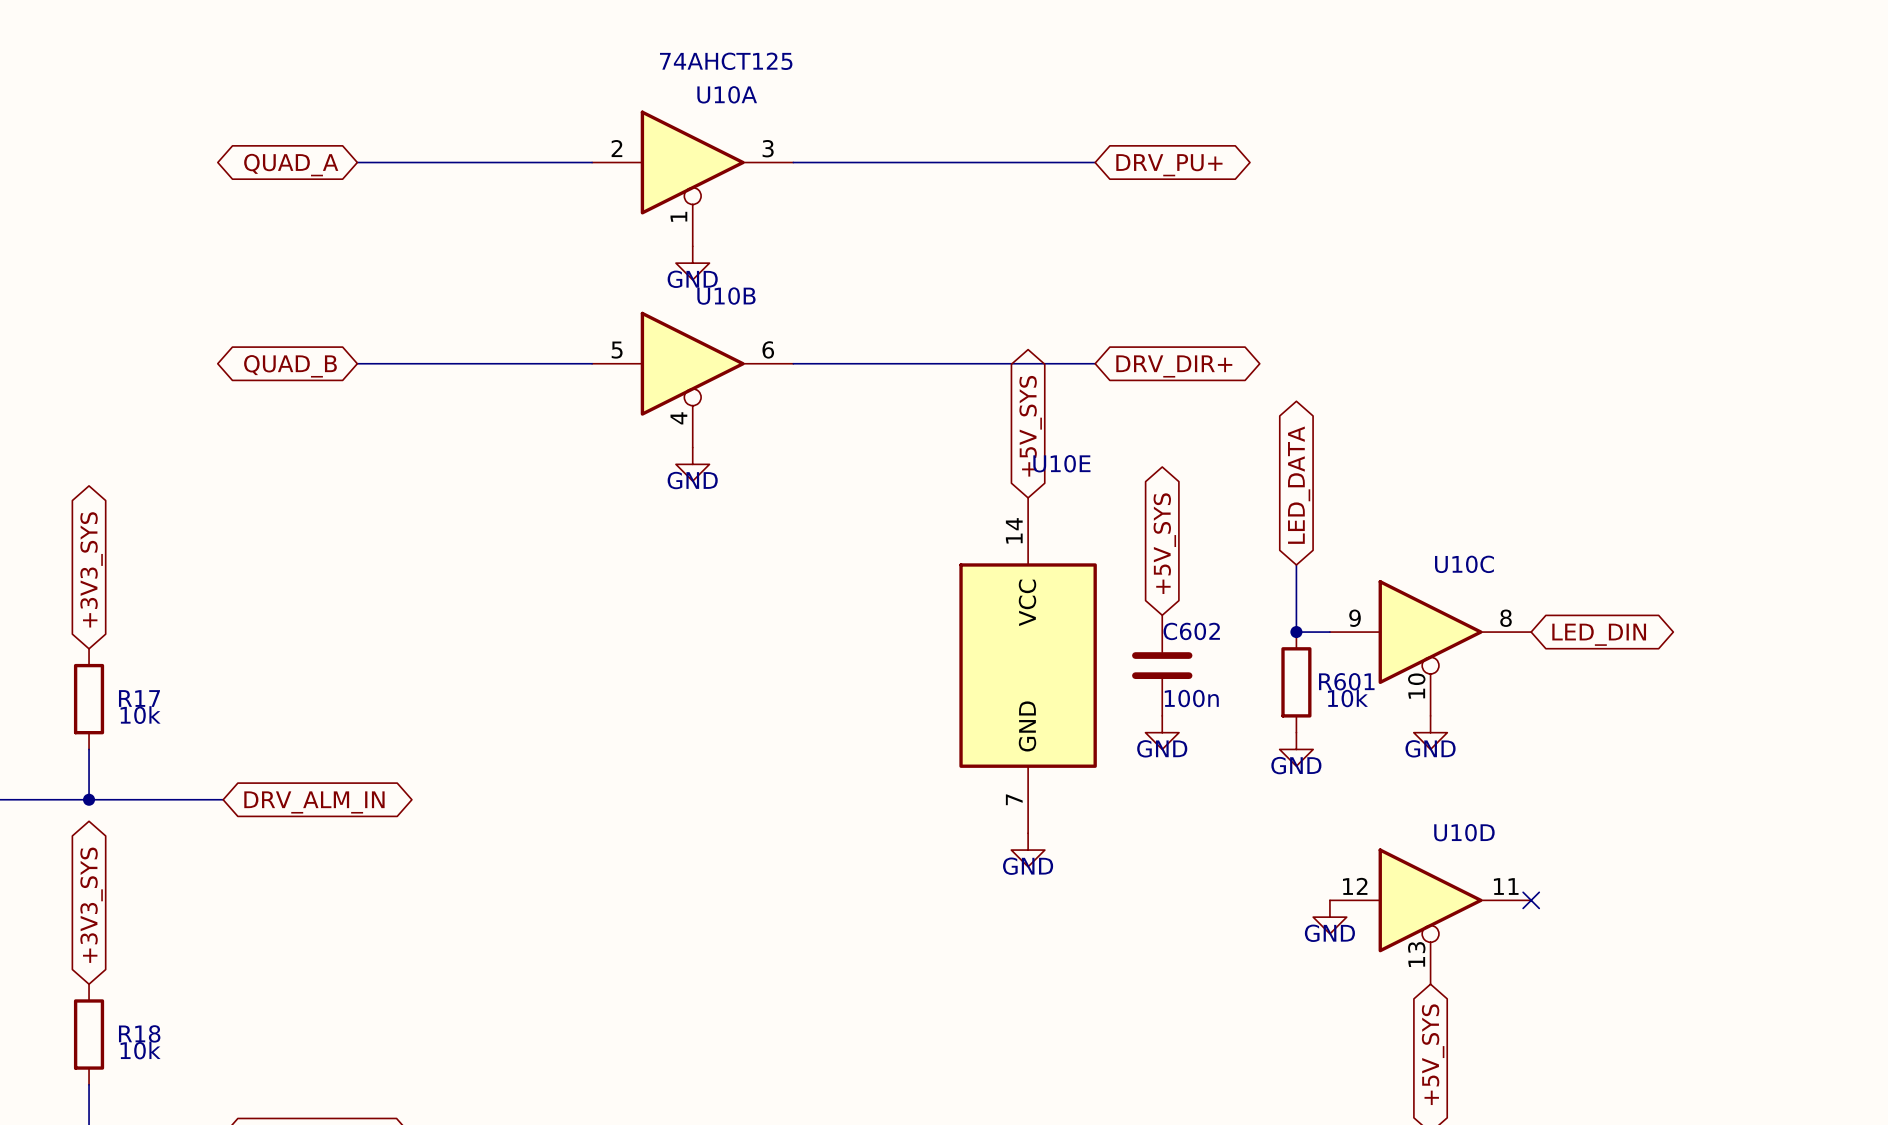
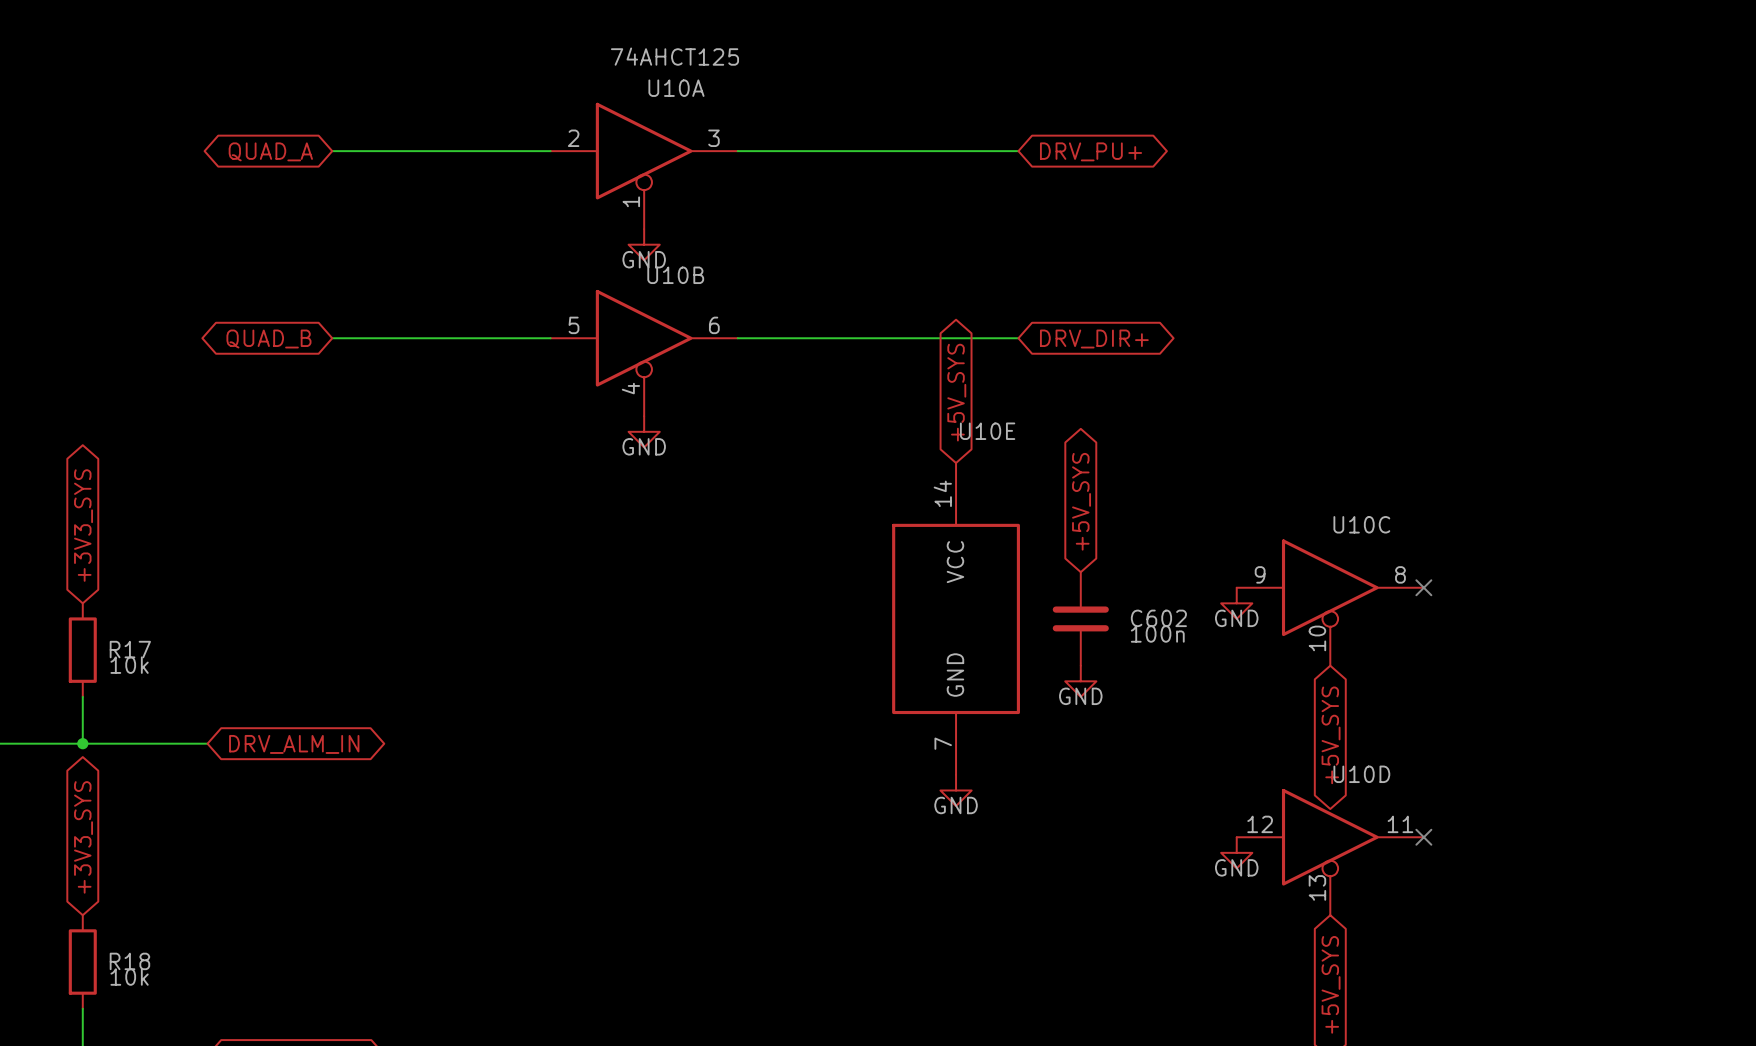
global label: LED_DATA (1299, 485) -> none
wire: (1296, 564) (1296, 632) (1329, 632) -> none
C602 name position: C602 (1191, 631) -> C602 (1158, 618)
junction: (1296, 632) -> none
no-connect mark: none -> (1423, 587)
global label: LED_DIN (1599, 634) -> none
power symbol: none -> GND (1236, 603)
R601: 10k (1296, 682) -> none
C602 value position: 100n (1191, 698) -> 100n (1157, 633)
power symbol: GND (1430, 732) -> none
power symbol: GND (1296, 749) -> none
global label: none -> +5V_SYS (1331, 735)

